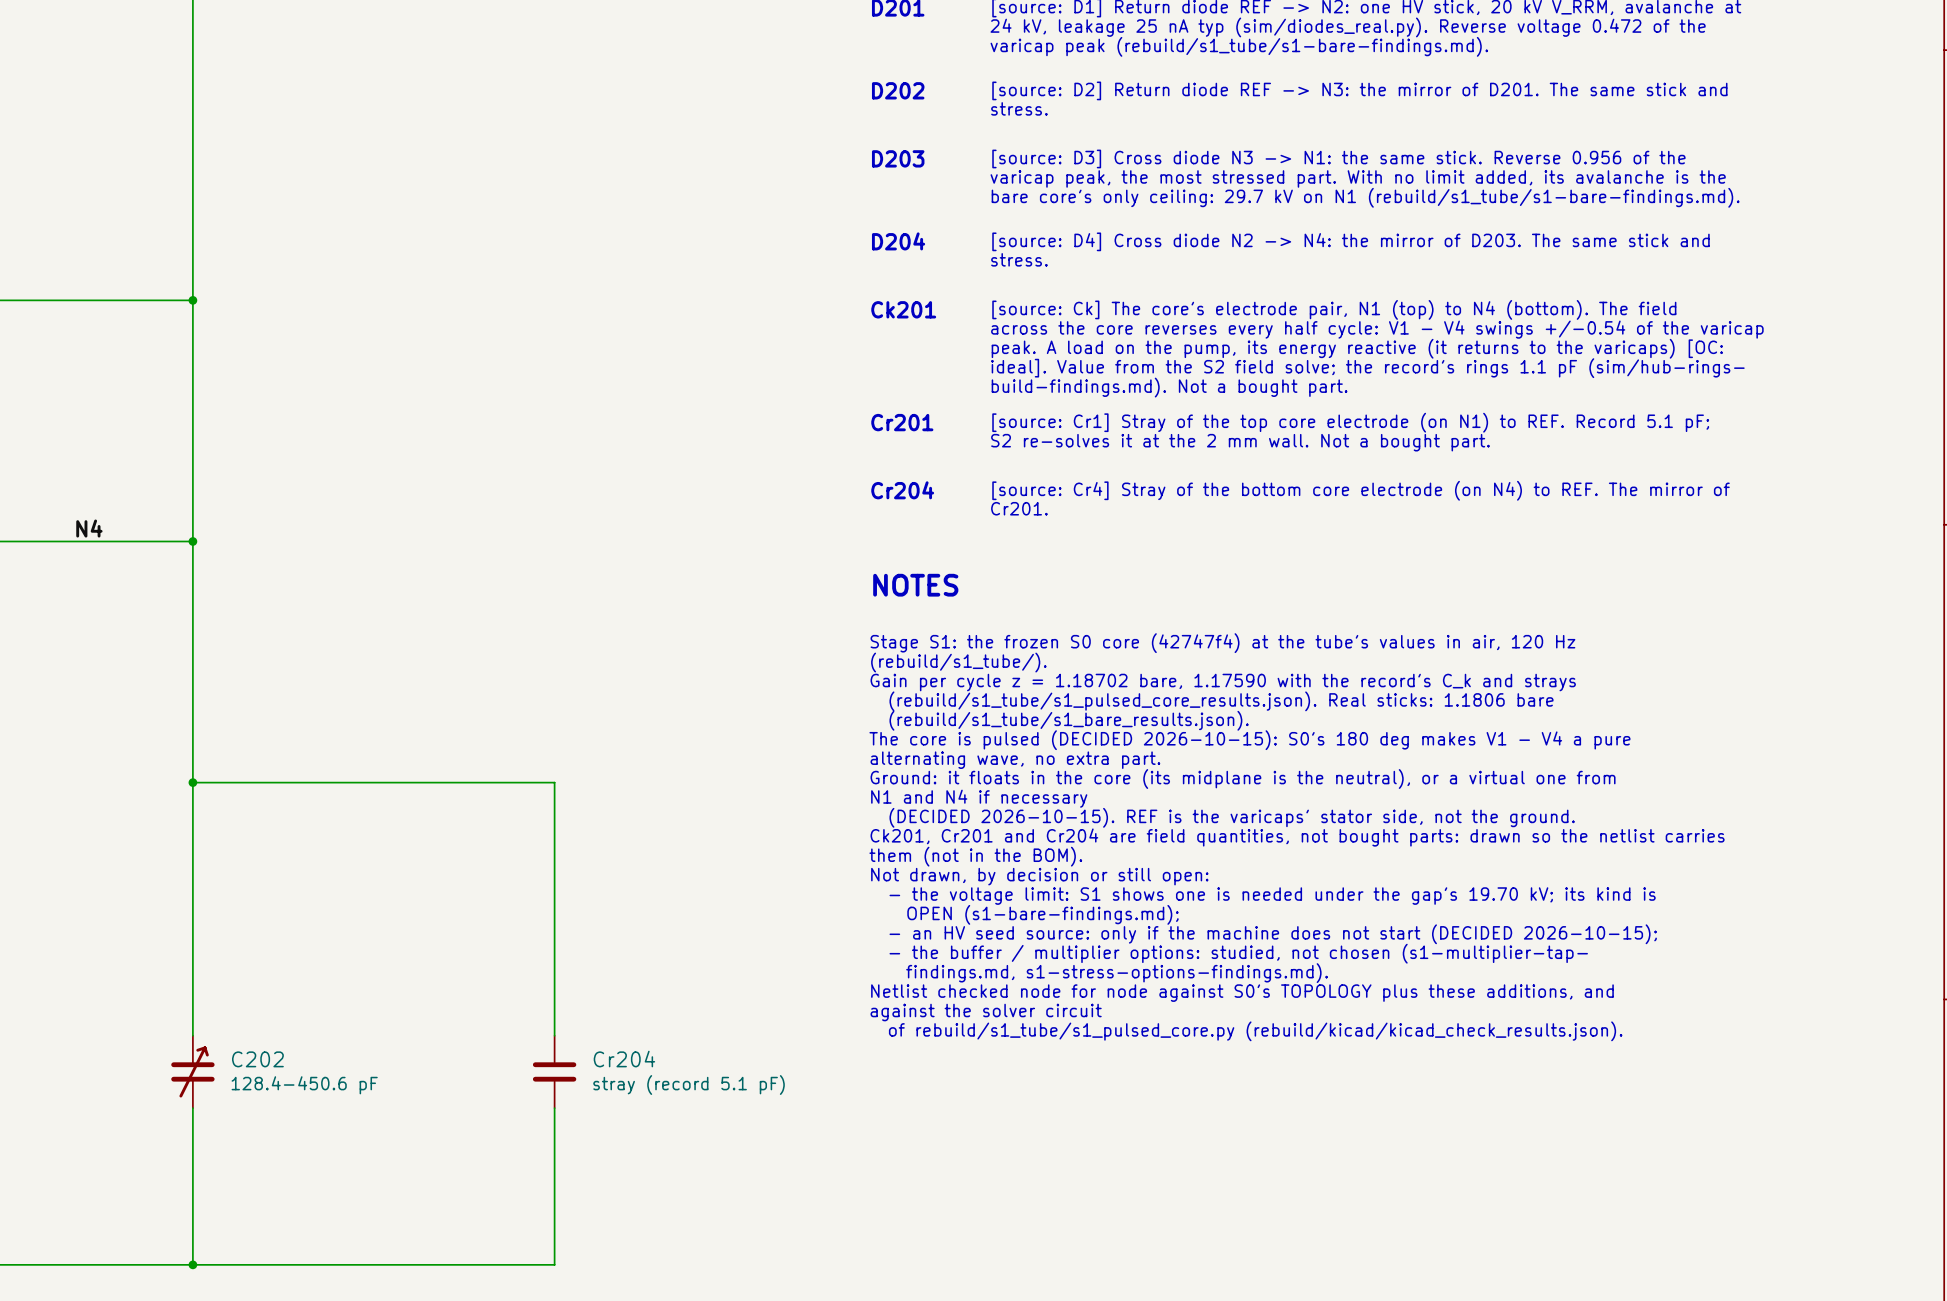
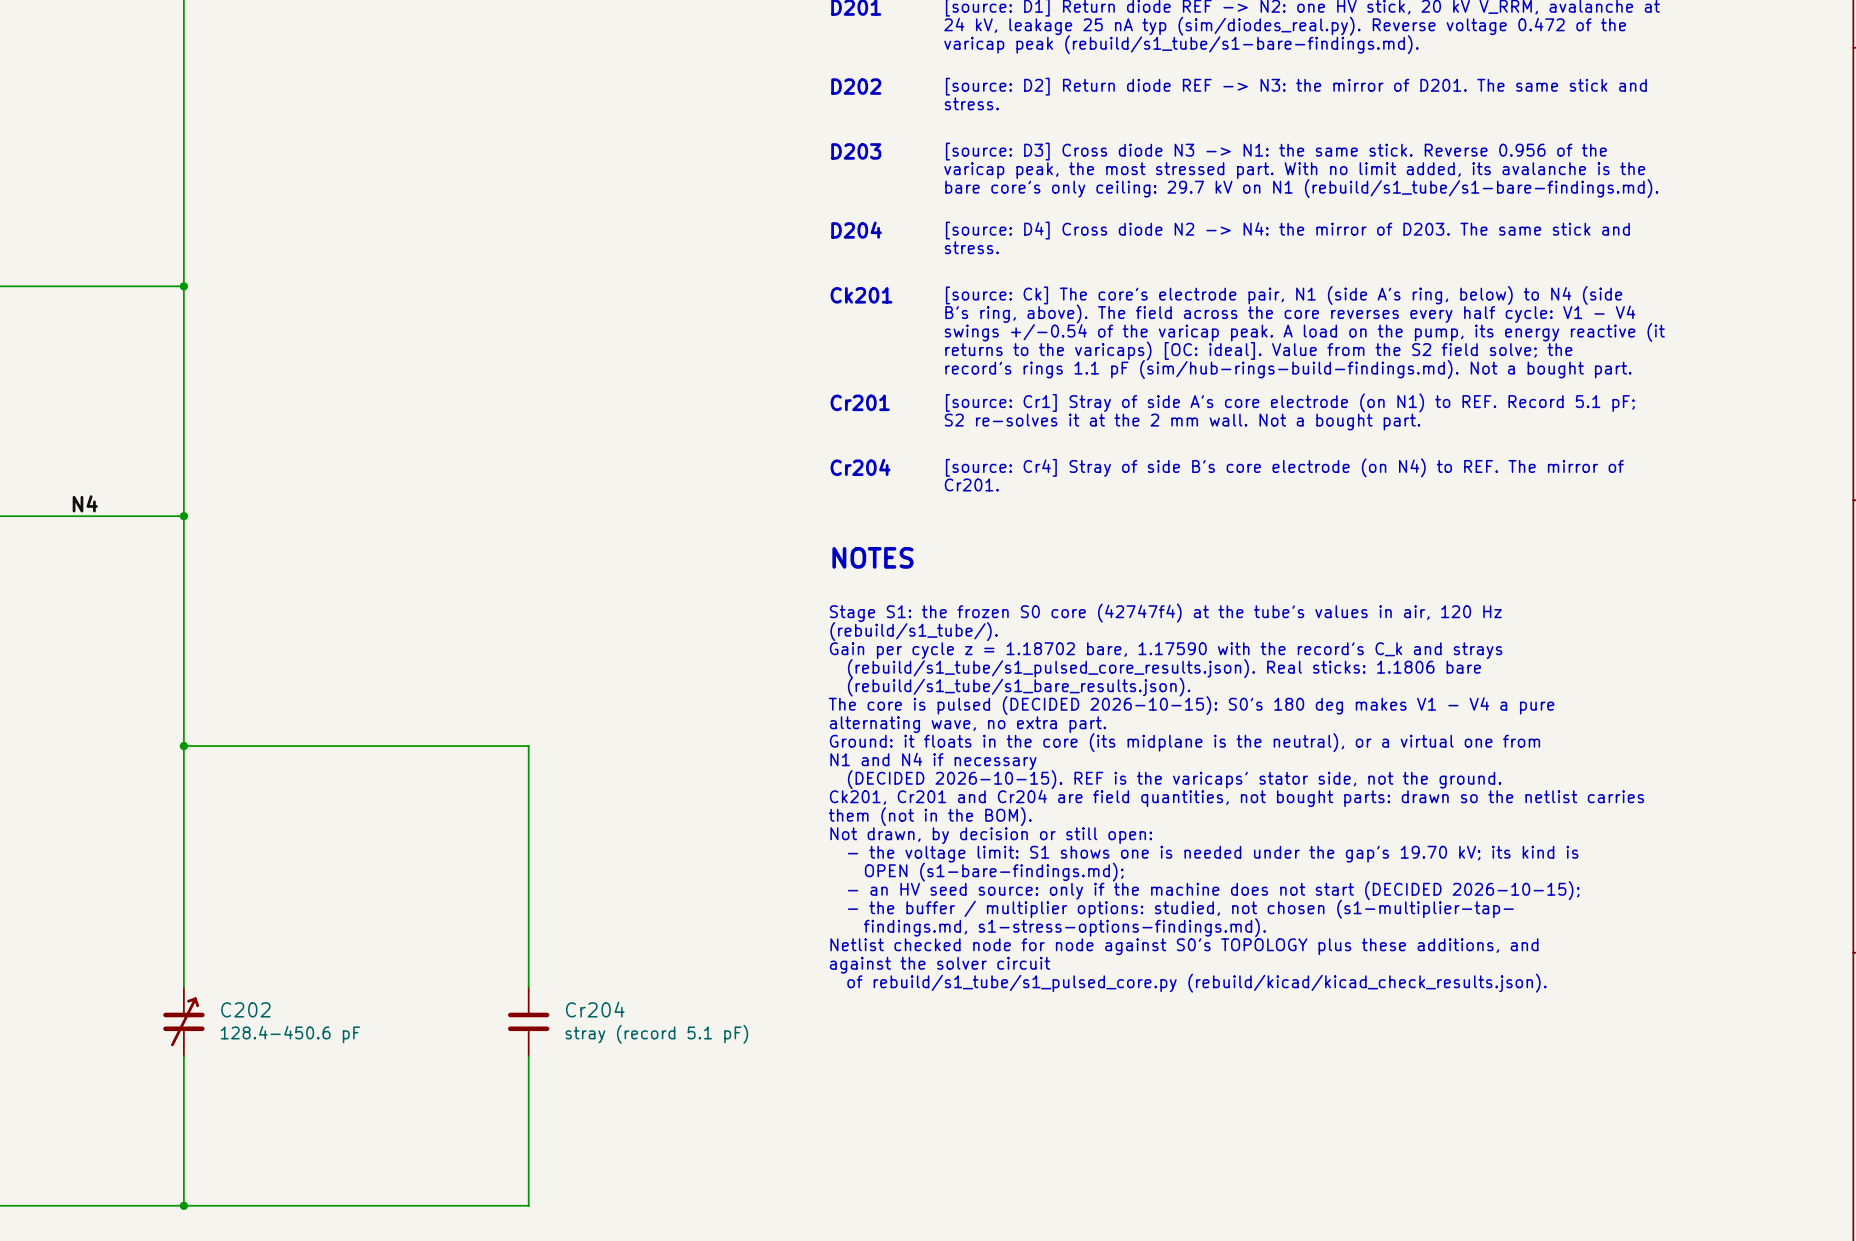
text: [source: Ck] The core's electrode pair, N1 (top) to N4 (bottom). The field (1334, 309) -> [source: Ck] The core's electrode pair, N1 (side A's ring, below) to N4 (side (1284, 295)
text: across the core reverses every half cycle: V1 - V4 swings +/-0.54 of the varicap (1377, 329) -> B's ring, above). The field across the core reverses every half cycle: V1 - V4 (1290, 313)
text: peak. A load on the pump, its energy reactive (it returns to the varicaps) [OC: (1357, 348) -> swings +/-0.54 of the varicap peak. A load on the pump, its energy reactive (it (1304, 332)
text: ideal]. Value from the S2 field solve; the record's rings 1.1 pF (sim/hub-rings- (1367, 368) -> returns to the varicaps) [OC: ideal]. Value from the S2 field solve; the (1258, 350)
text: build-findings.md). Not a bought part. (1169, 387) -> record's rings 1.1 pF (sim/hub-rings-build-findings.md). Not a bought part. (1288, 369)
text: [source: Cr1] Stray of the top core electrode (on N1) to REF. Record 5.1 pF; (1350, 422) -> [source: Cr1] Stray of side A's core electrode (on N1) to REF. Record 5.1 pF; (1290, 402)
text: [source: Cr4] Stray of the bottom core electrode (on N4) to REF. The mirror of (1361, 490) -> [source: Cr4] Stray of side B's core electrode (on N4) to REF. The mirror of (1284, 467)

